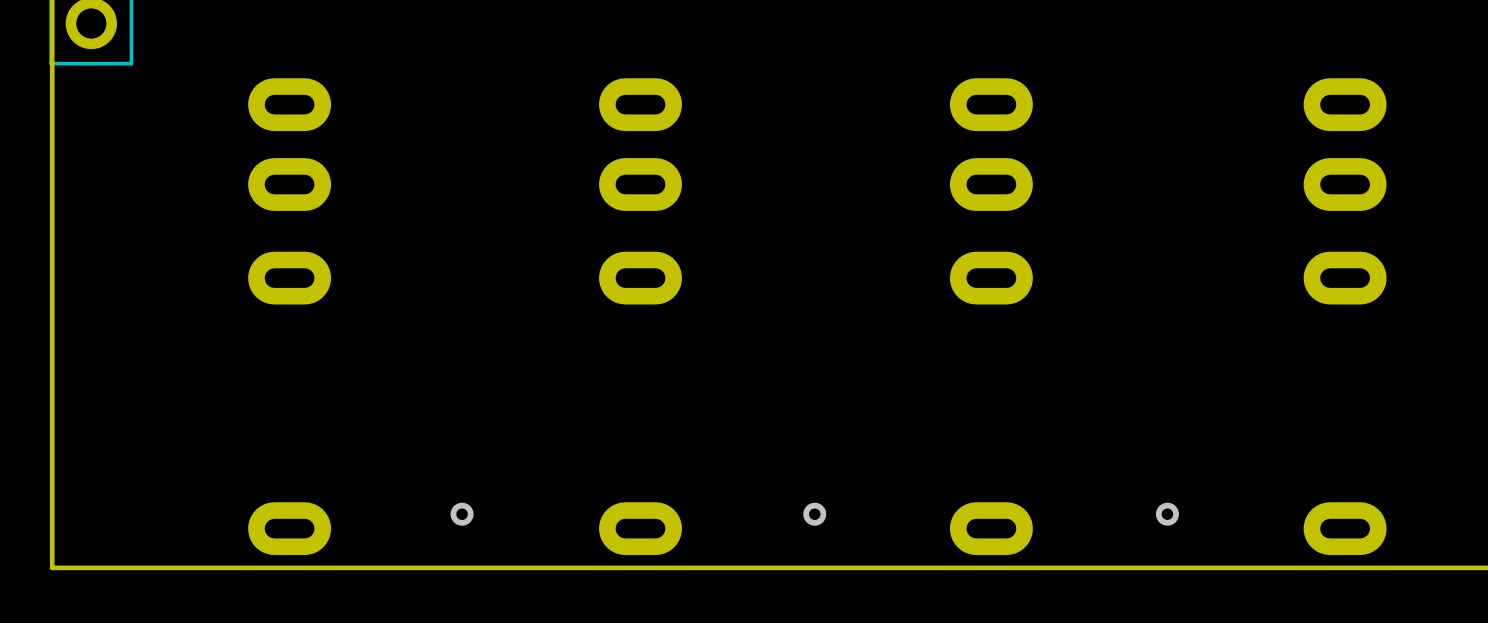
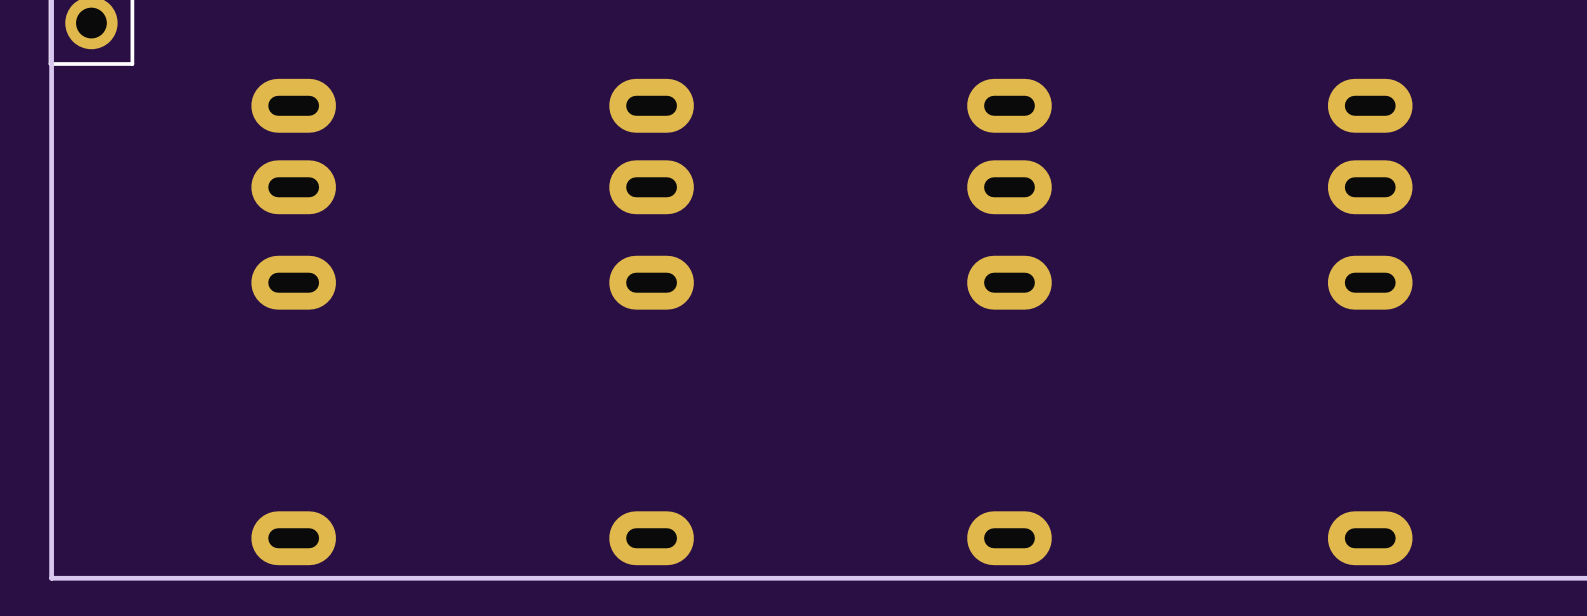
via: (462, 514) -> none
via: (814, 514) -> none
via: (1167, 514) -> none

